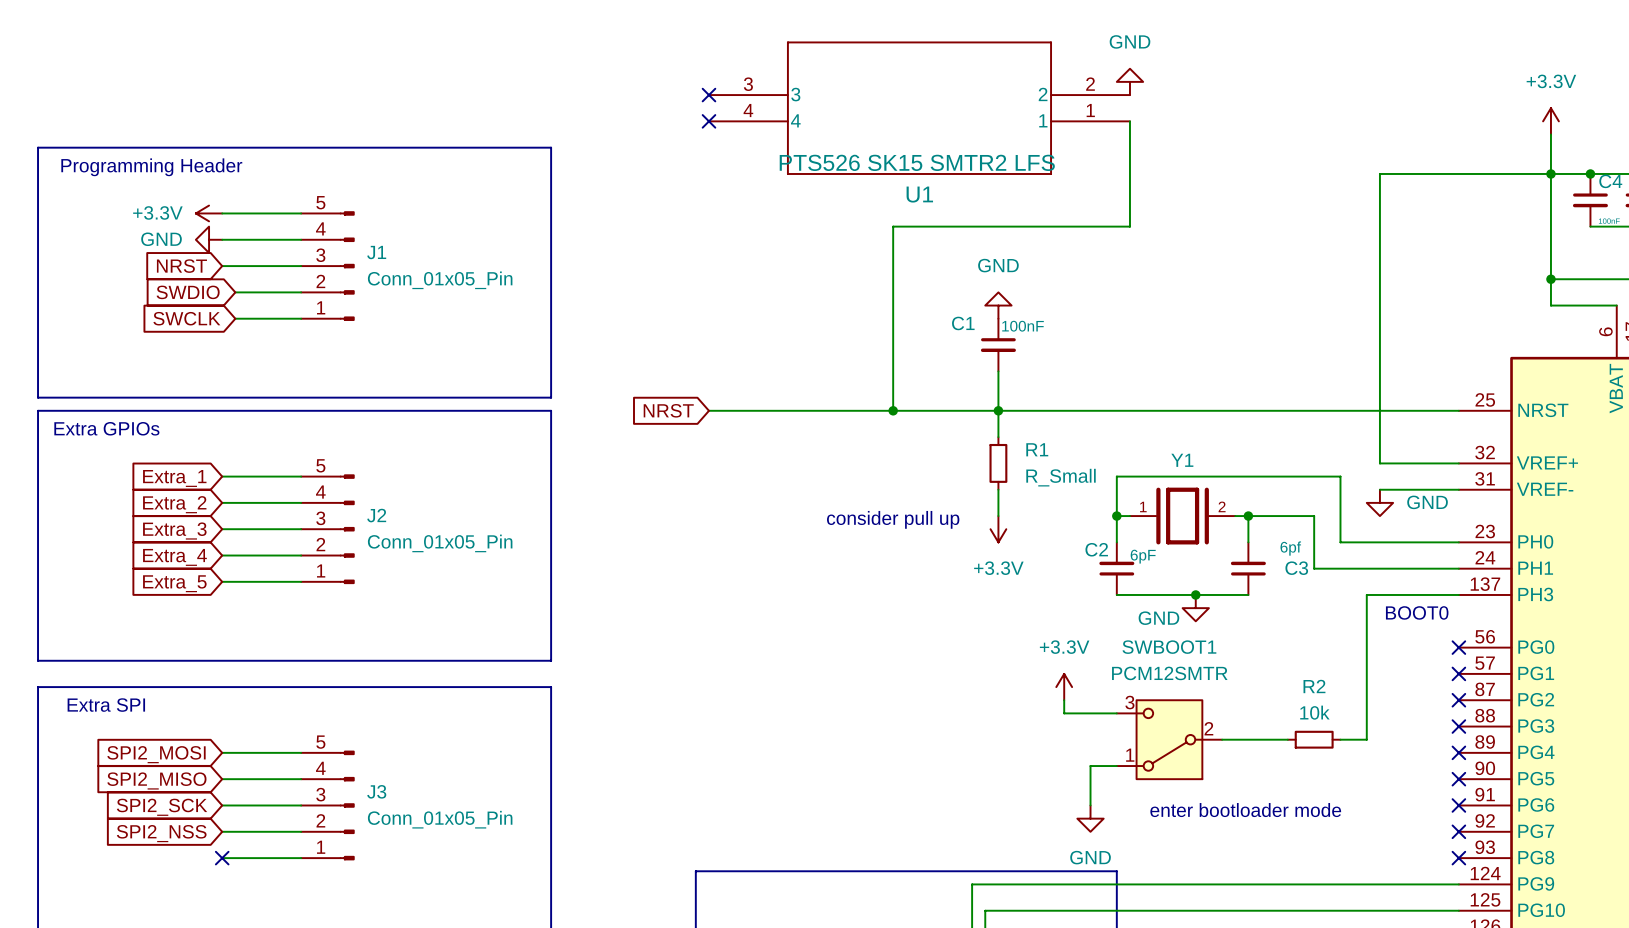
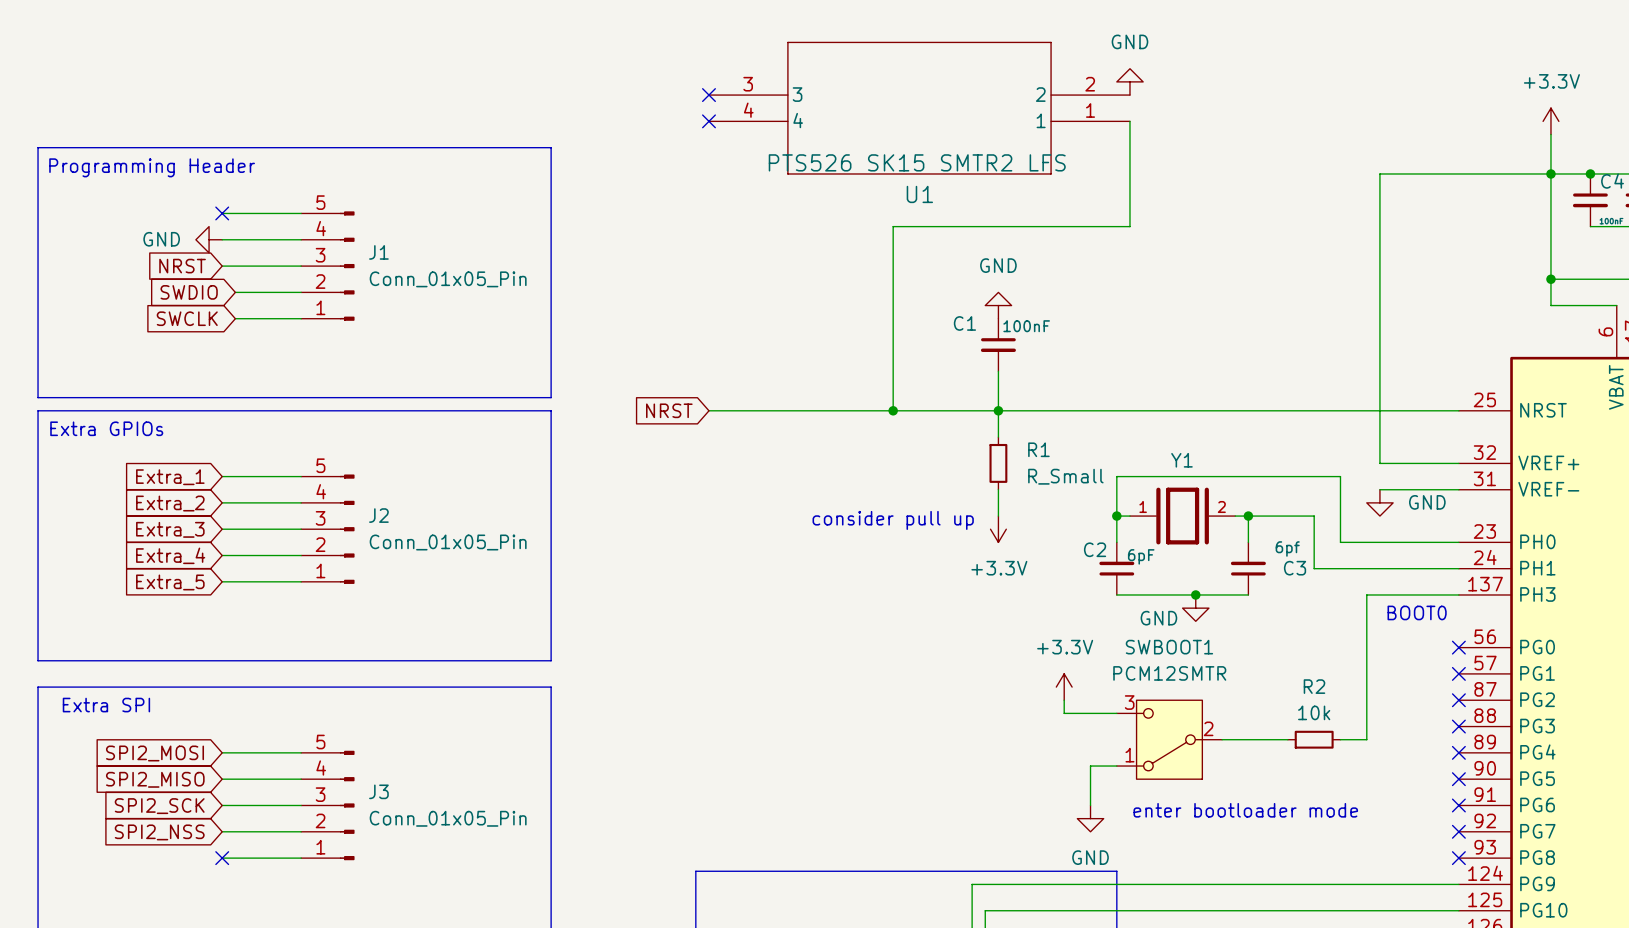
power symbol: +3.3V (209, 213) -> none
no-connect mark: none -> (222, 213)

